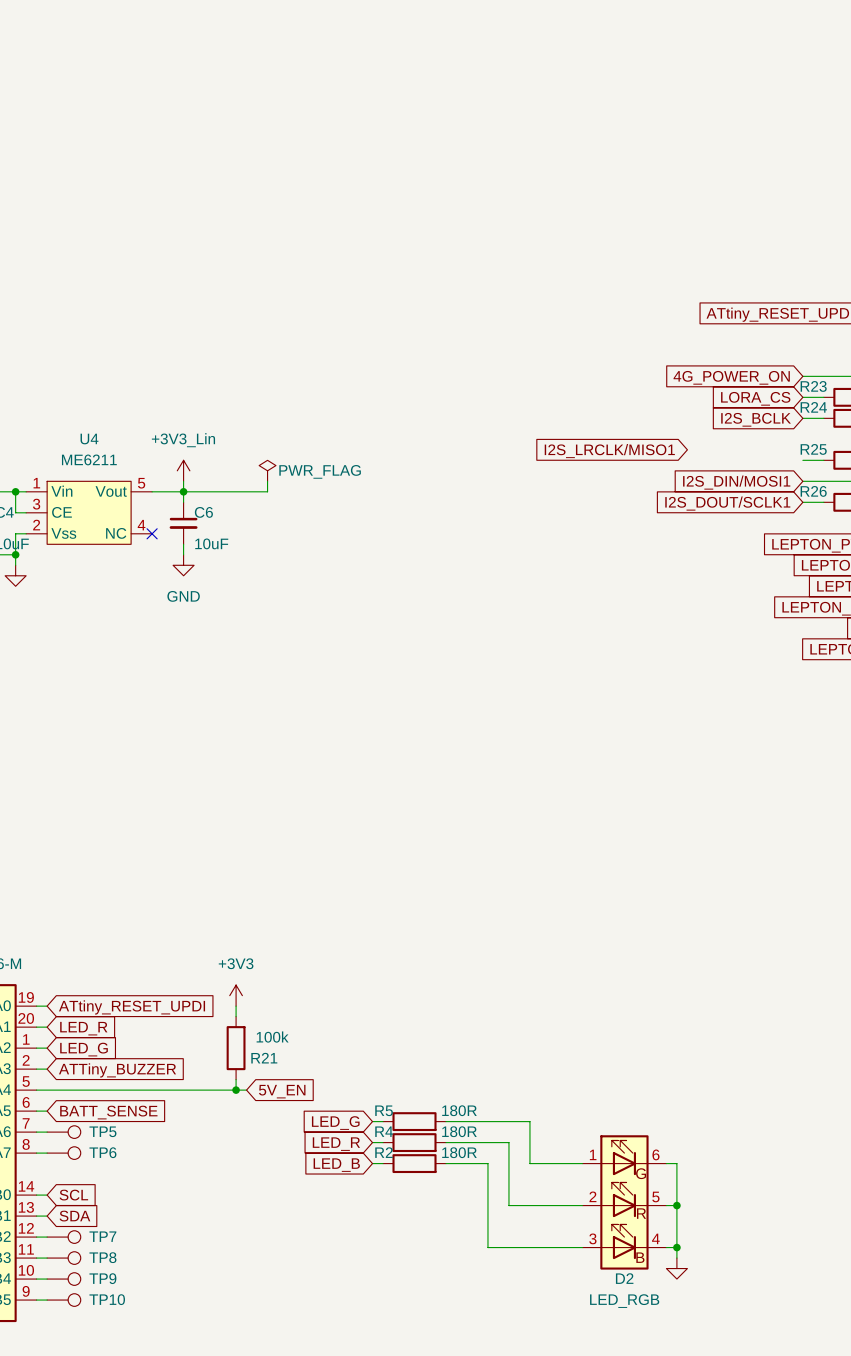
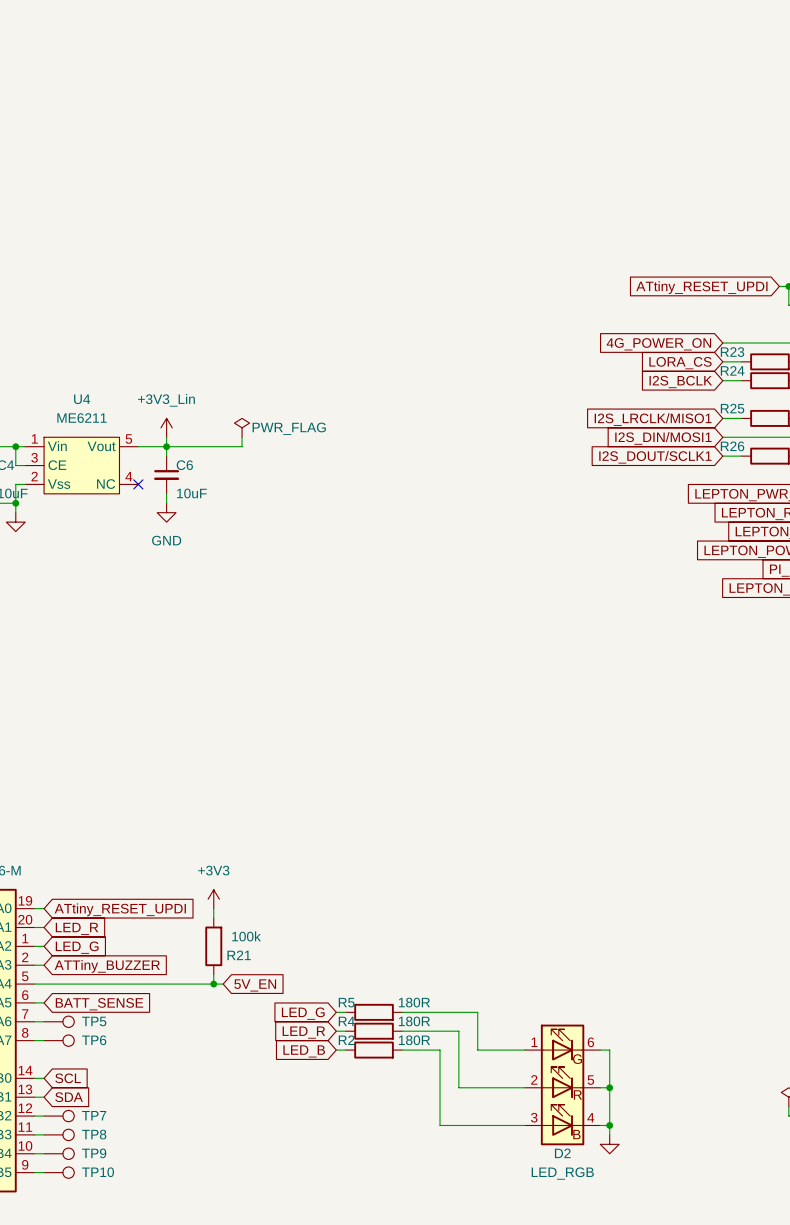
global label position: I2S_LRCLK/MISO1 (609, 451) -> I2S_LRCLK/MISO1 (653, 419)

